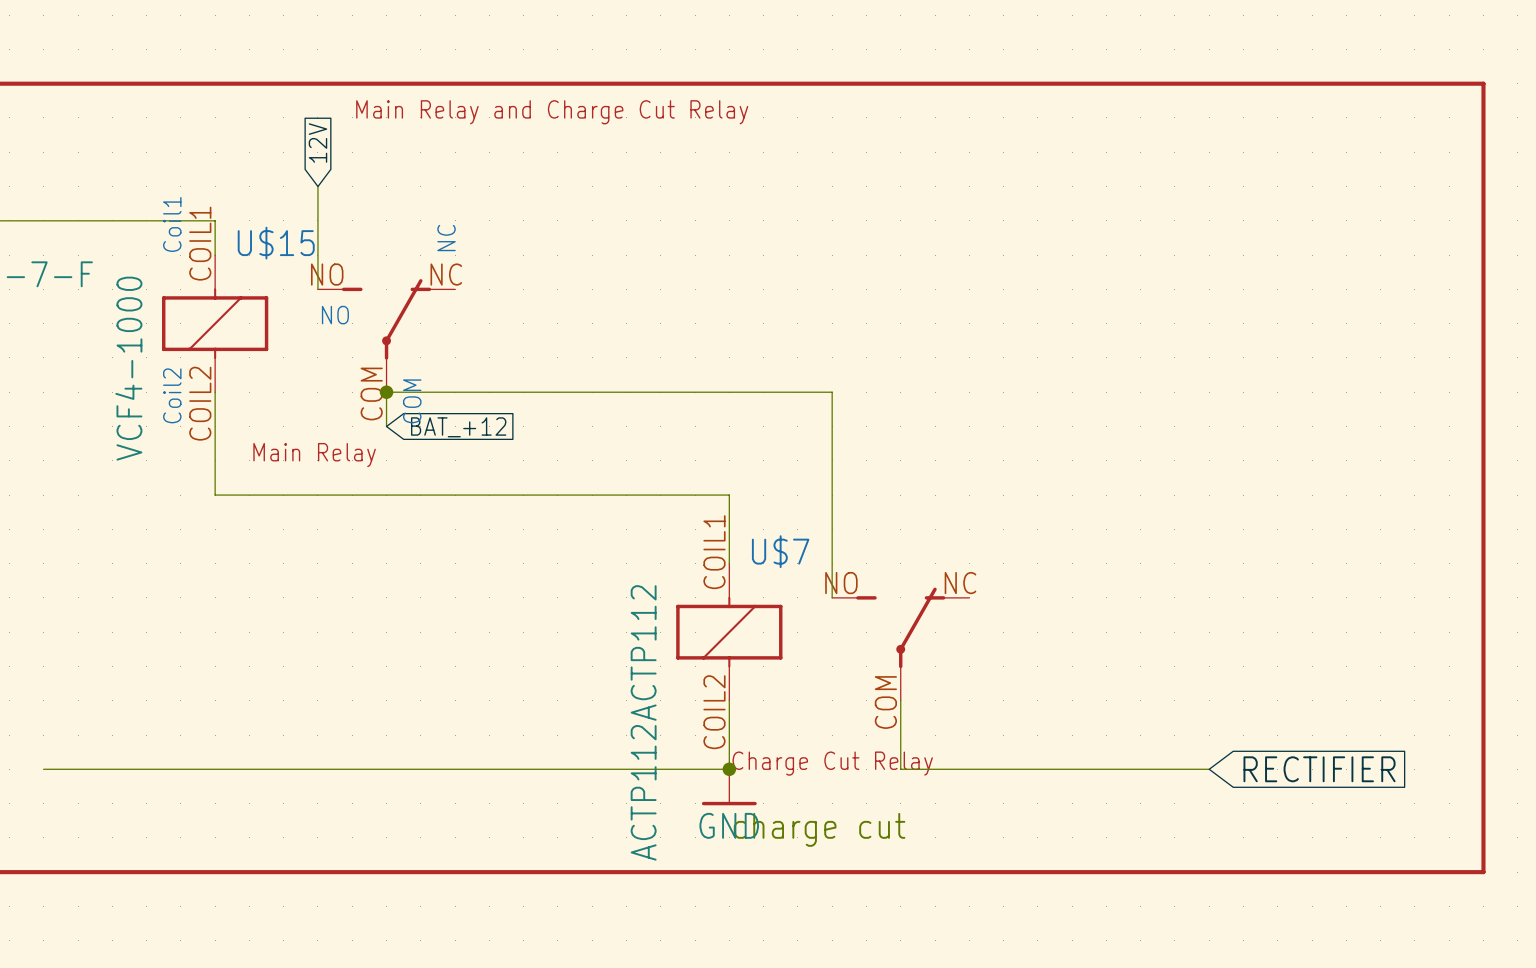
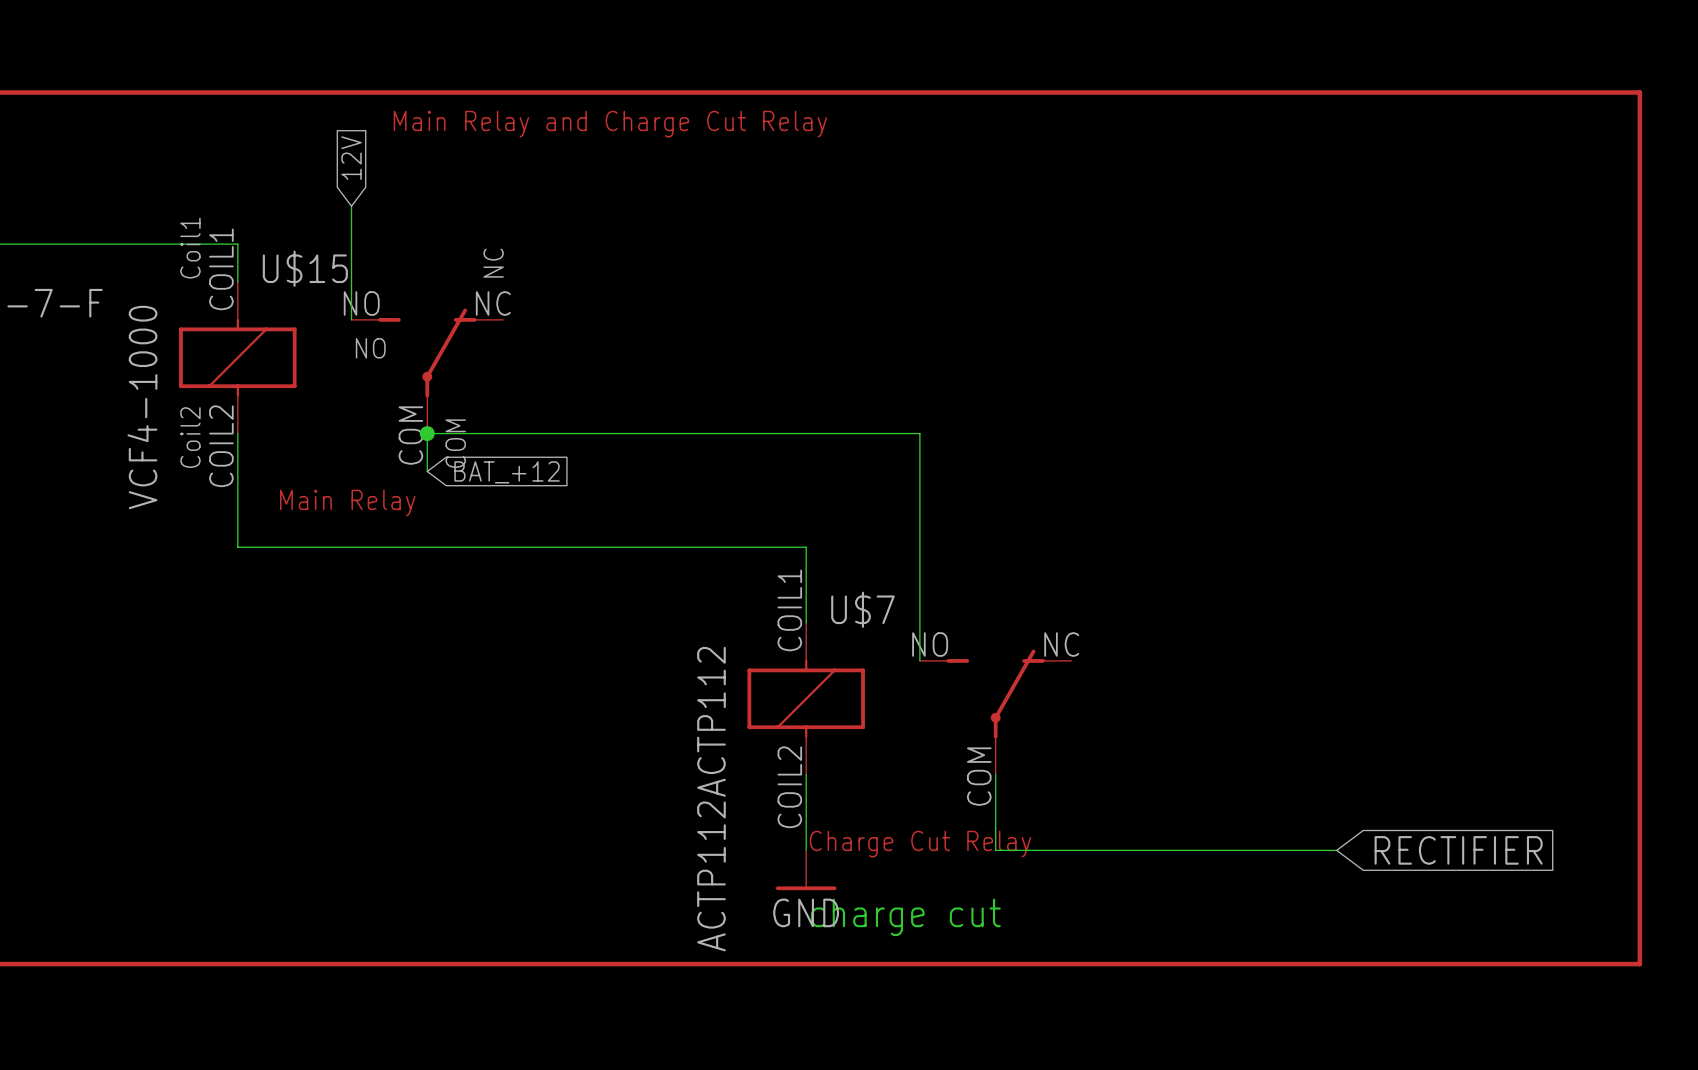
wire: (43, 769) (729, 769) -> none
junction: (729, 769) -> none

